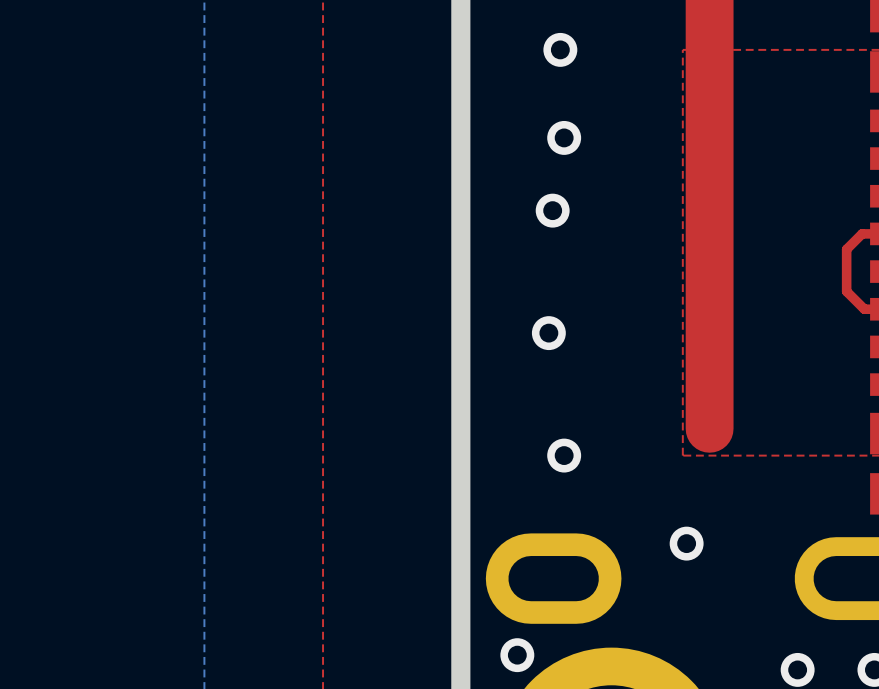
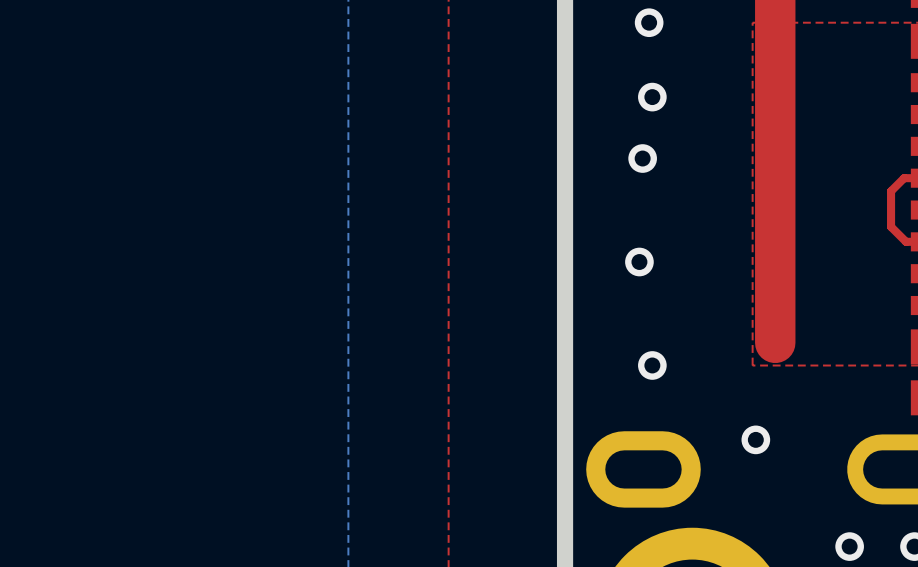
via: (517, 655) -> none

